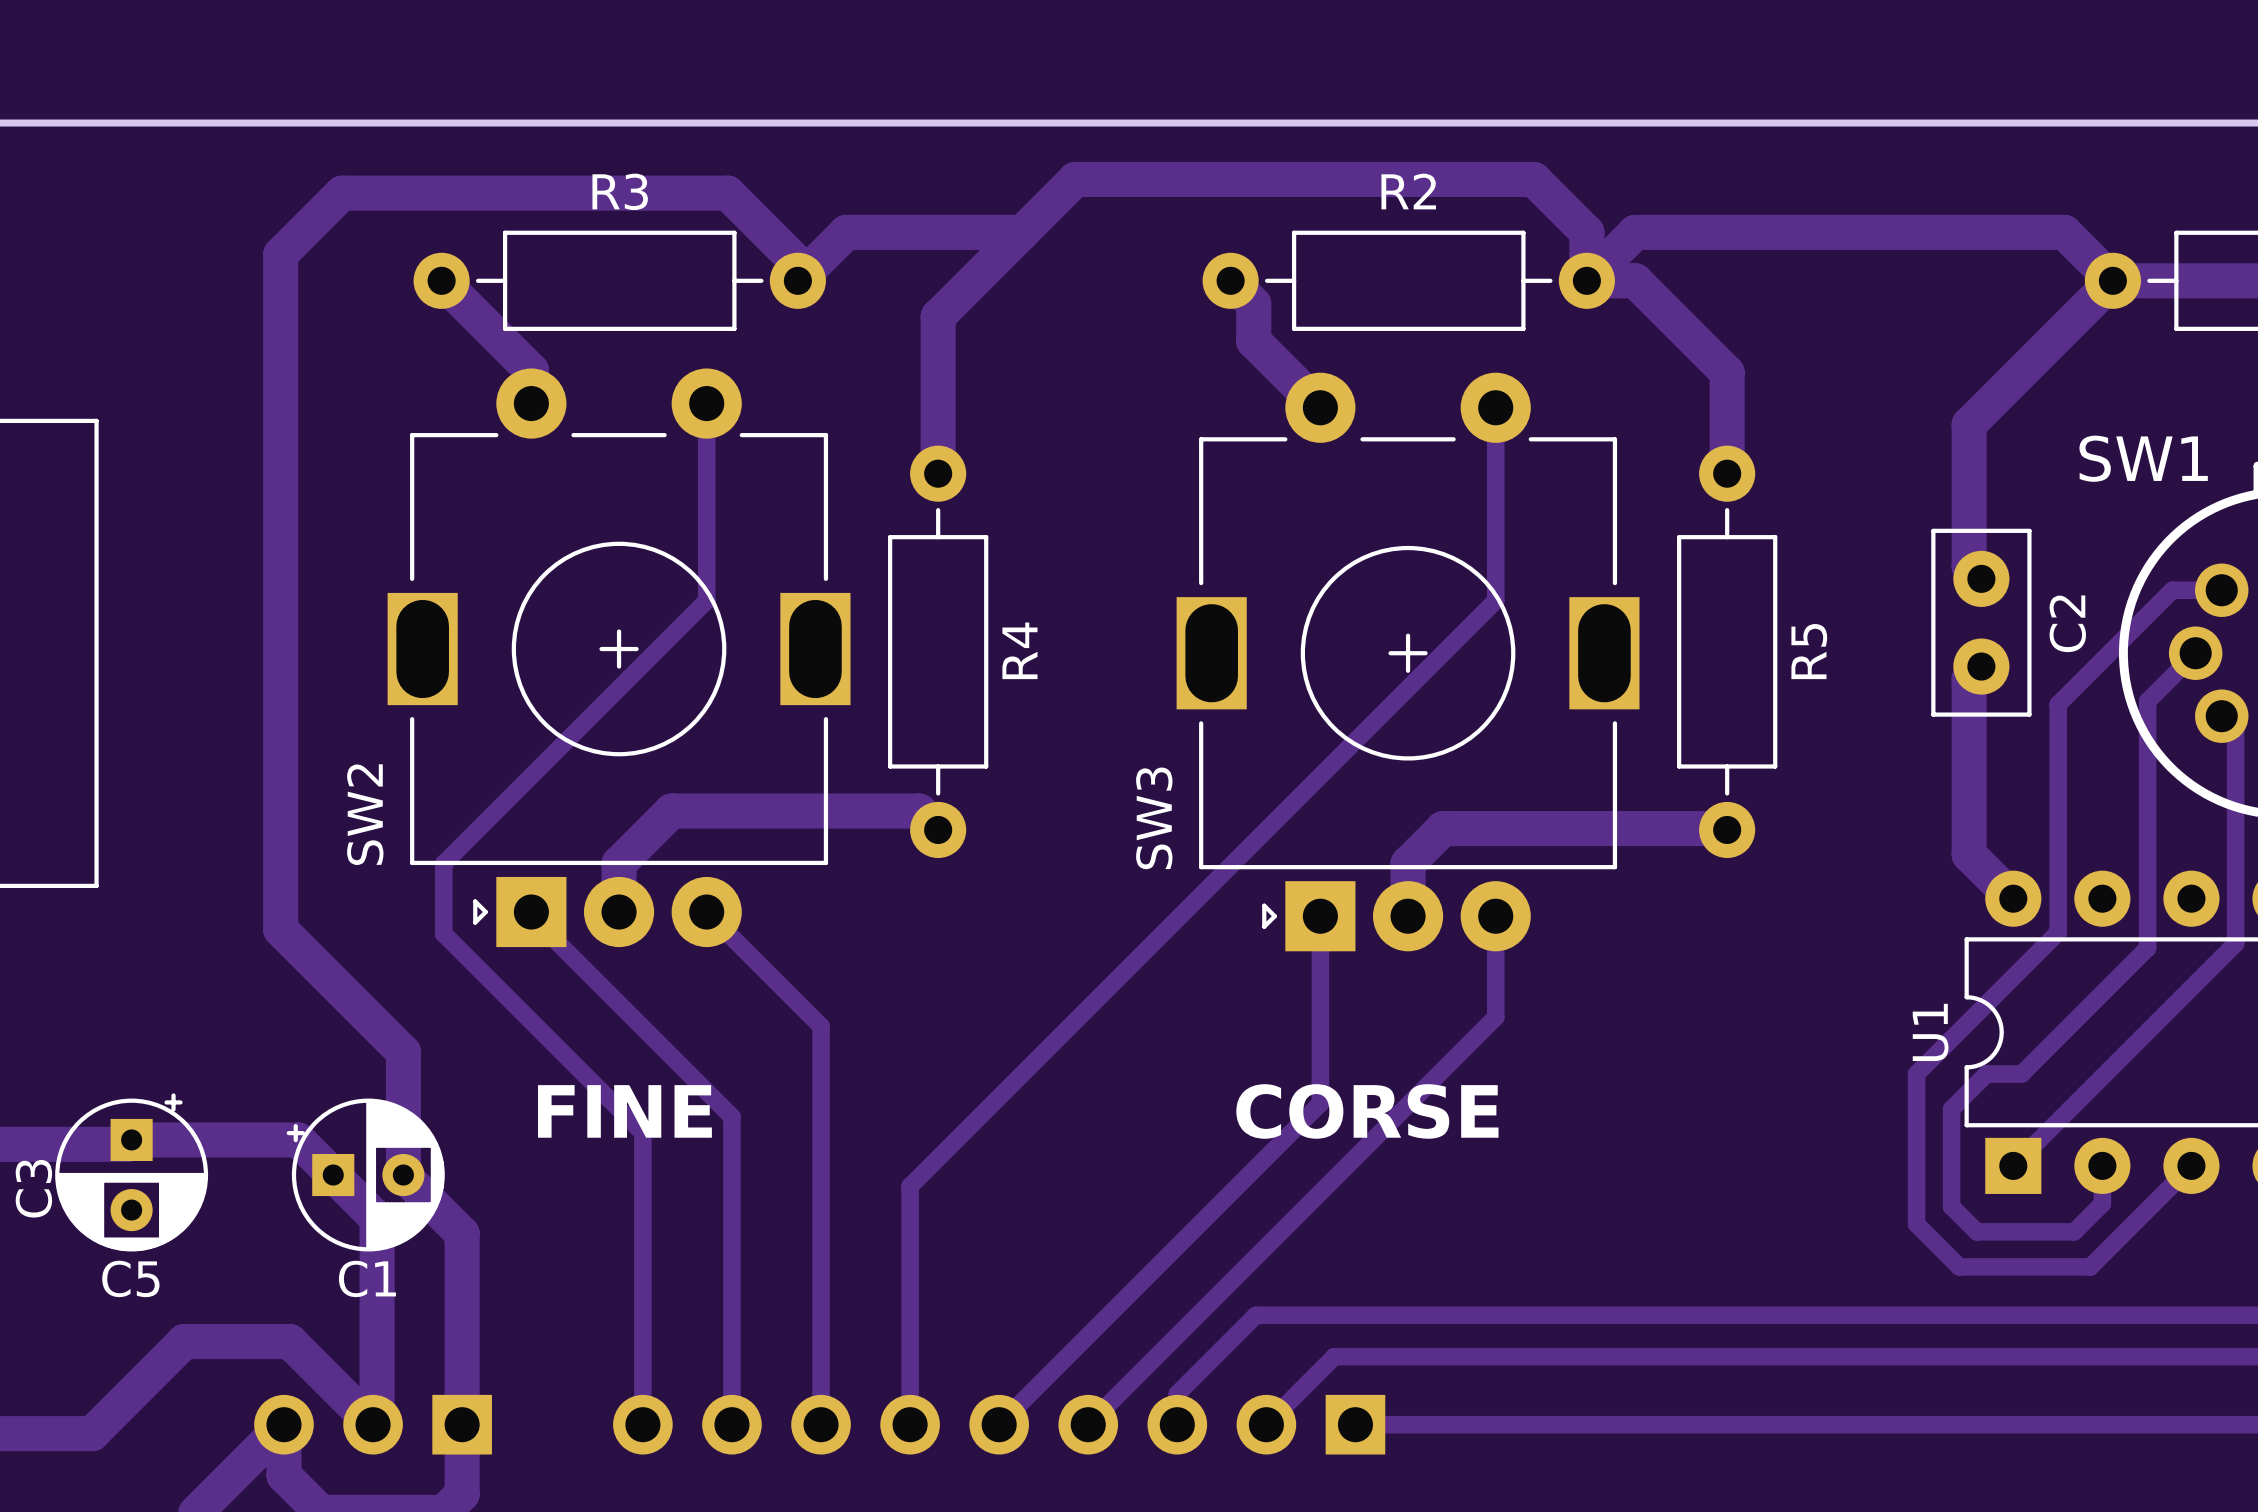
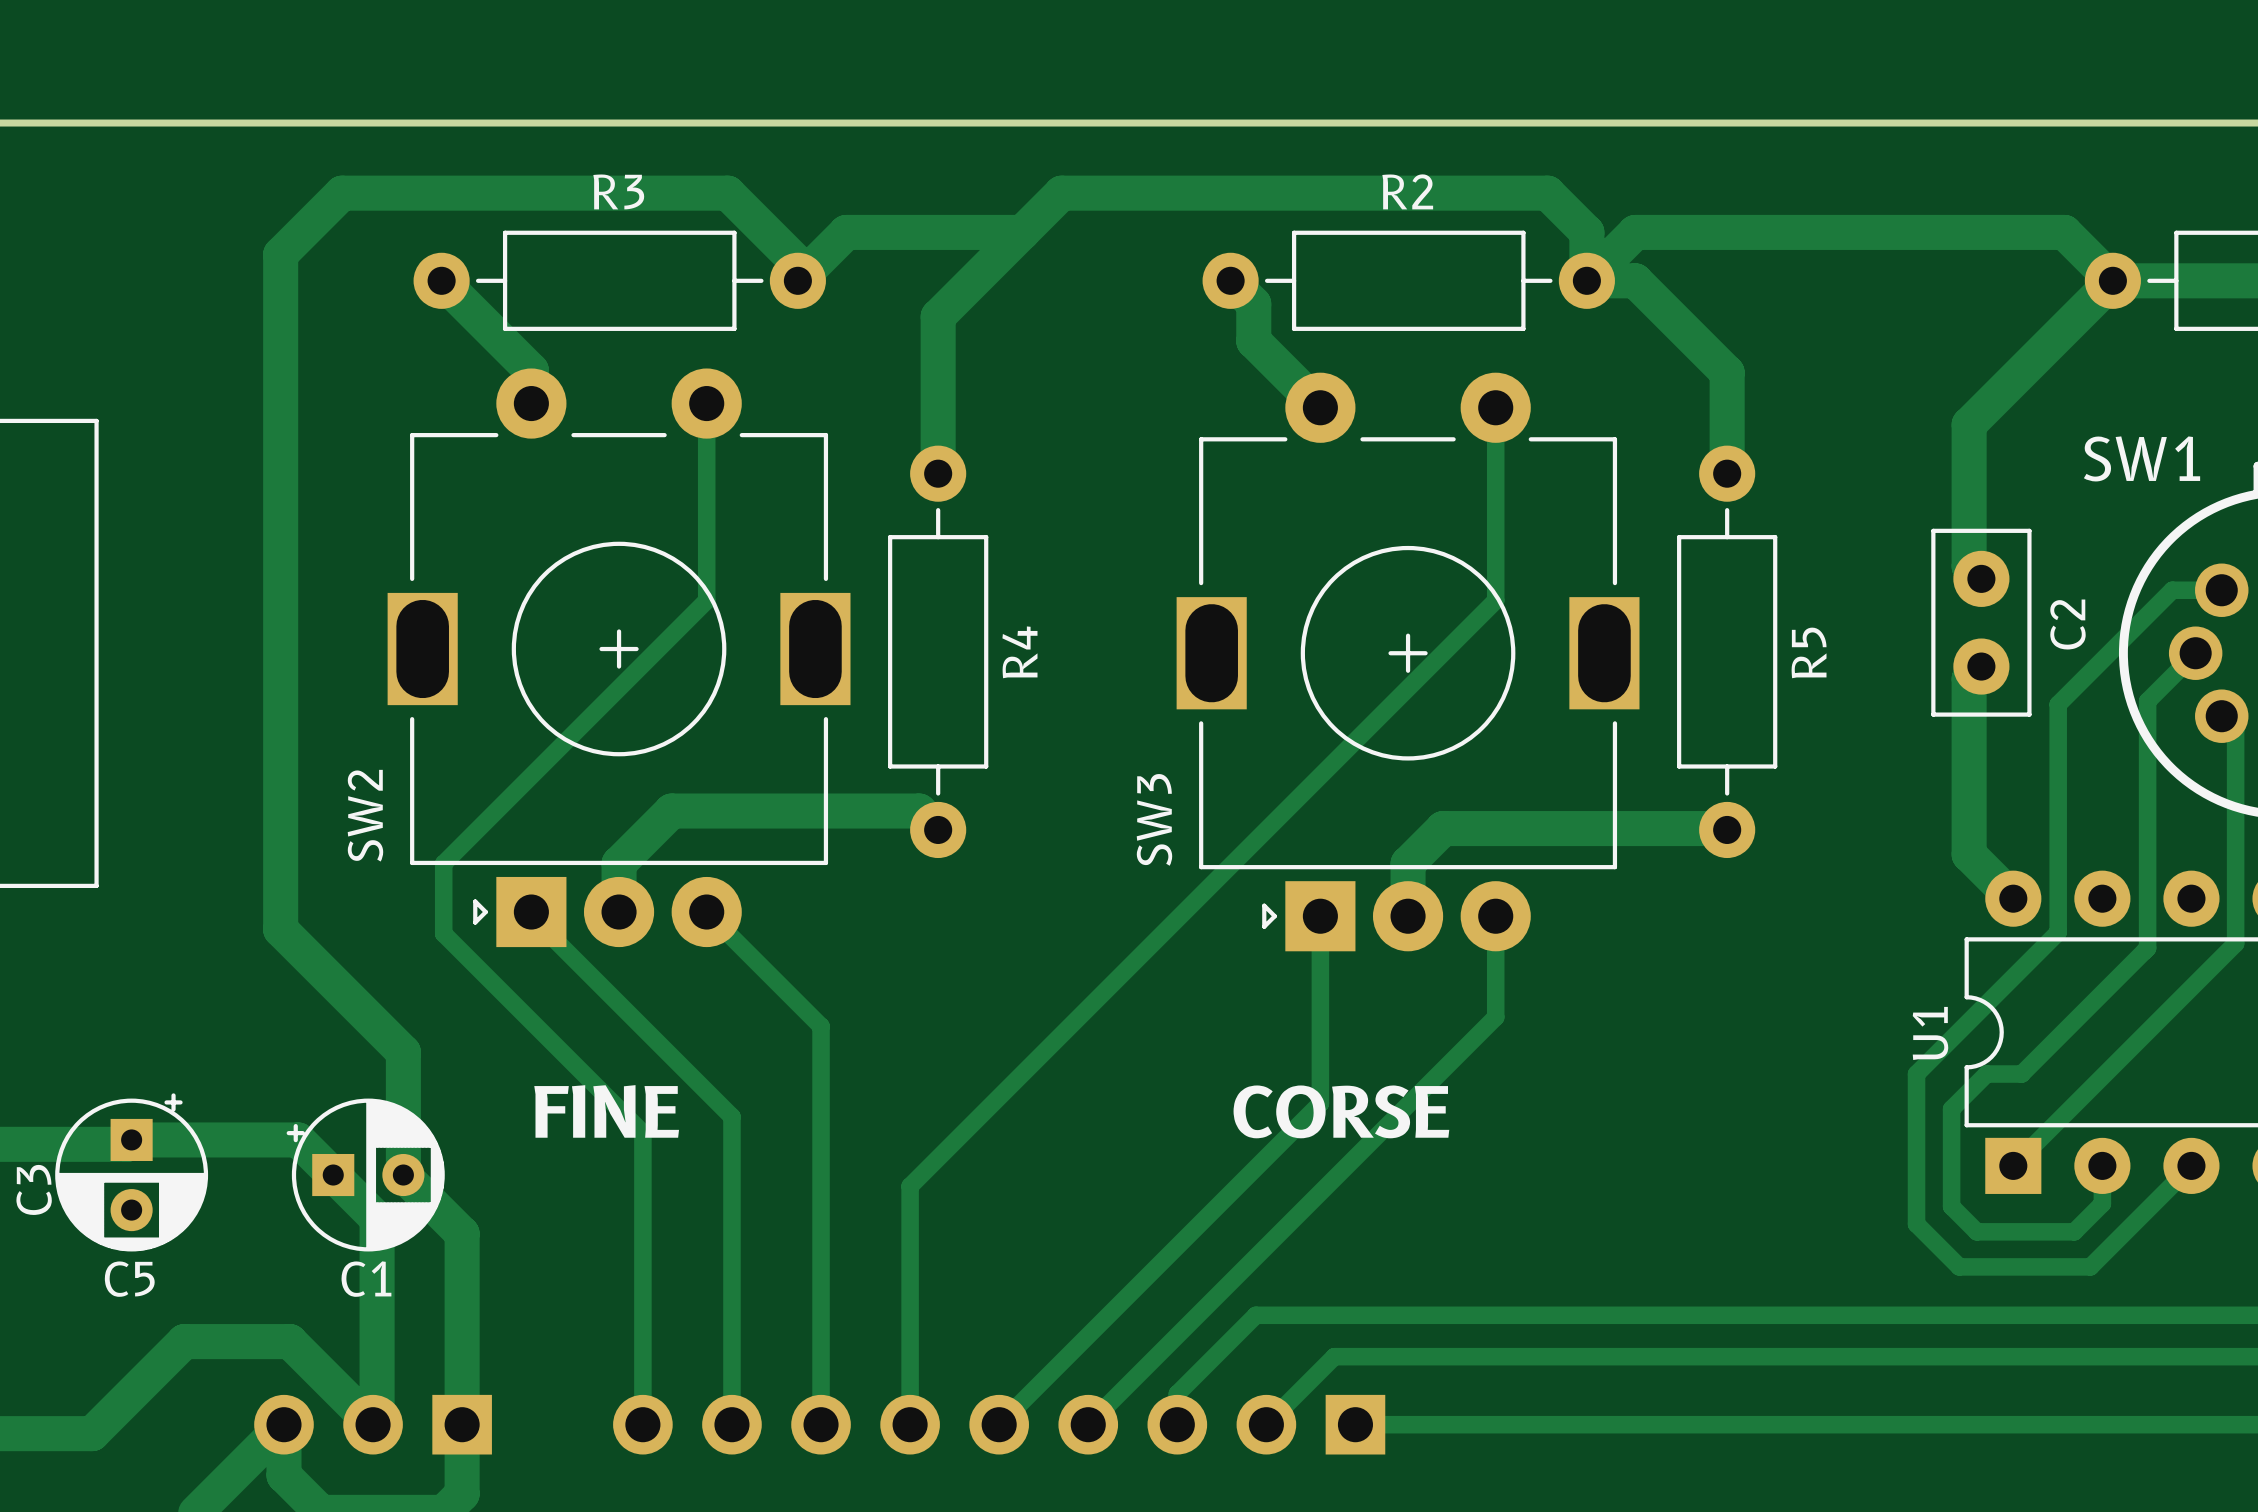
track: (1061, 193) (1075, 179) (1533, 179) (1547, 193) -> (1061, 193) (1547, 193)

